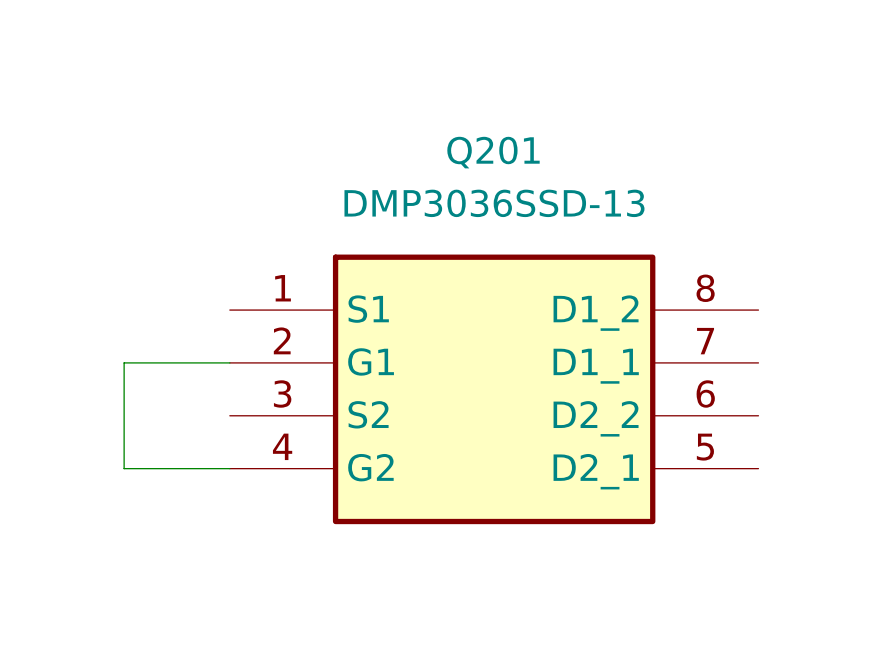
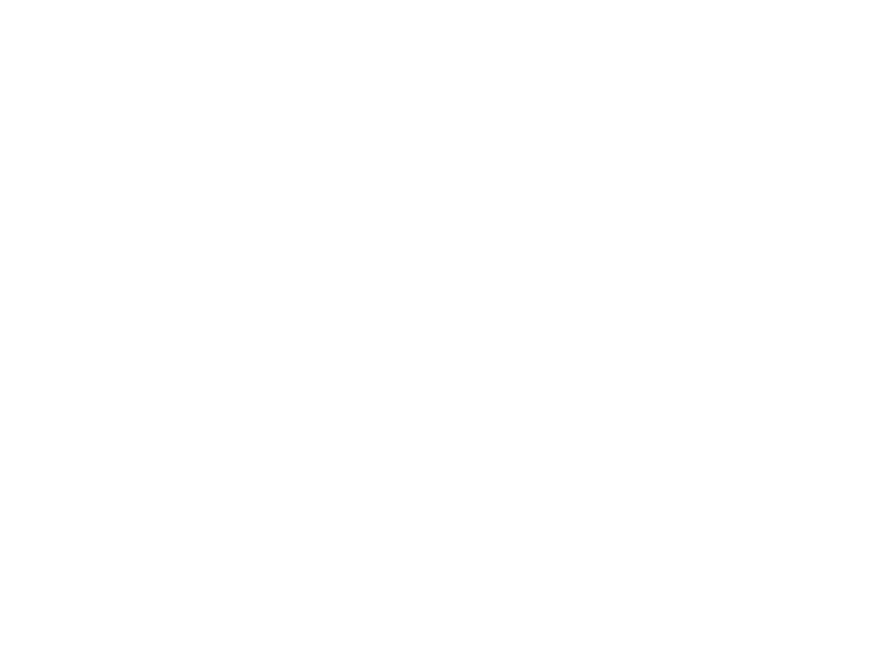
wire: (229, 362) (124, 362) (124, 468) (229, 468) -> none
Q201: DMP3036SSD-13 (494, 389) -> none

